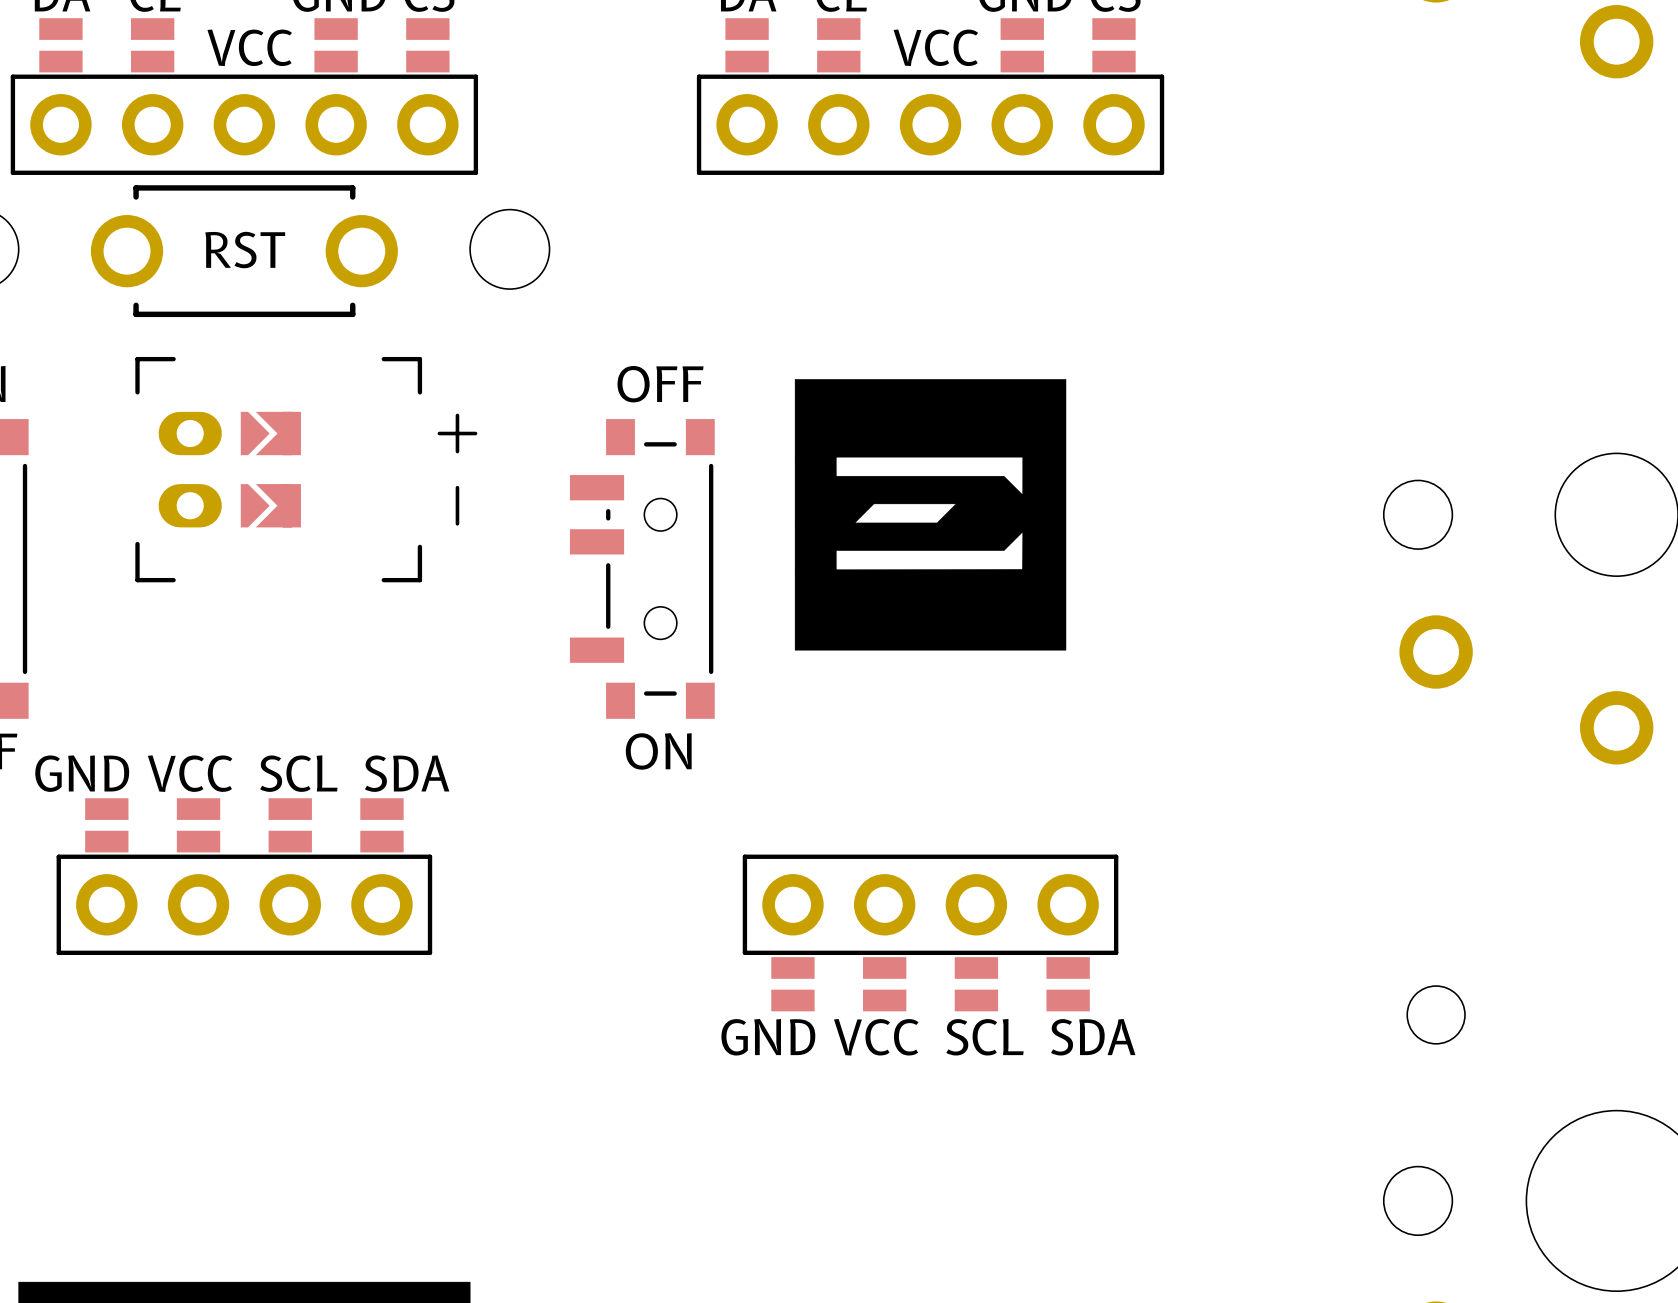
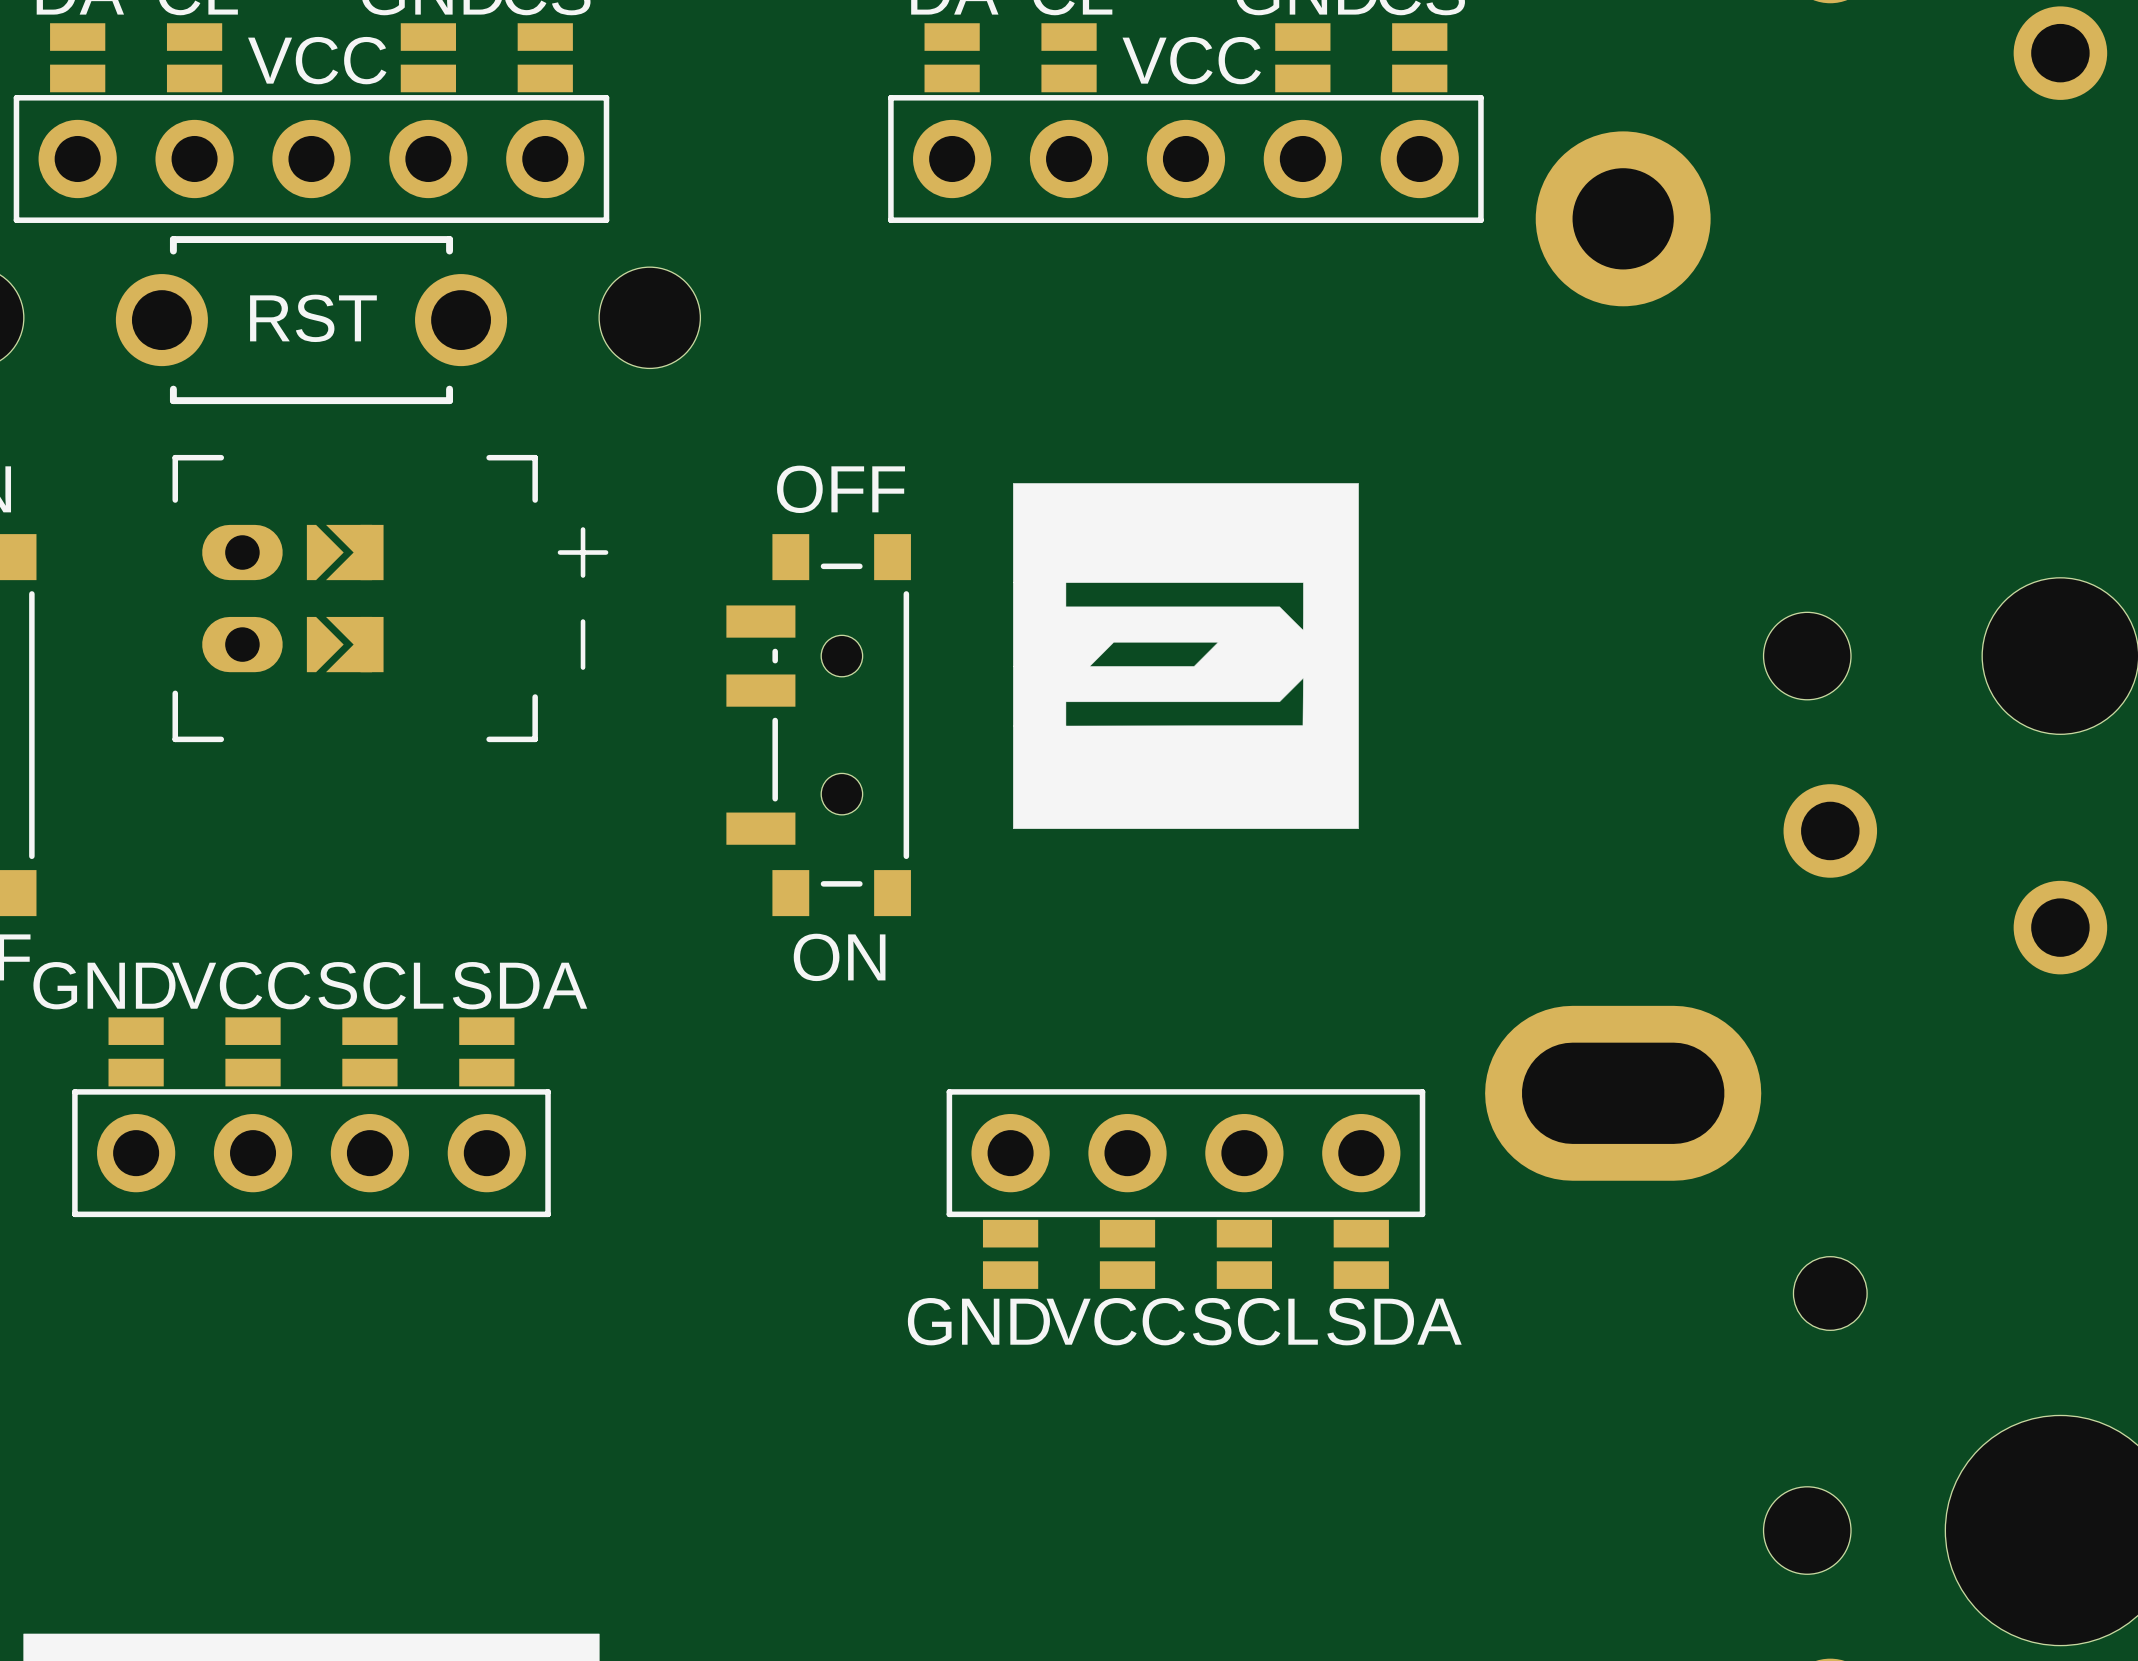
part: none -> (1623, 218)
part: none -> (1623, 1093)

